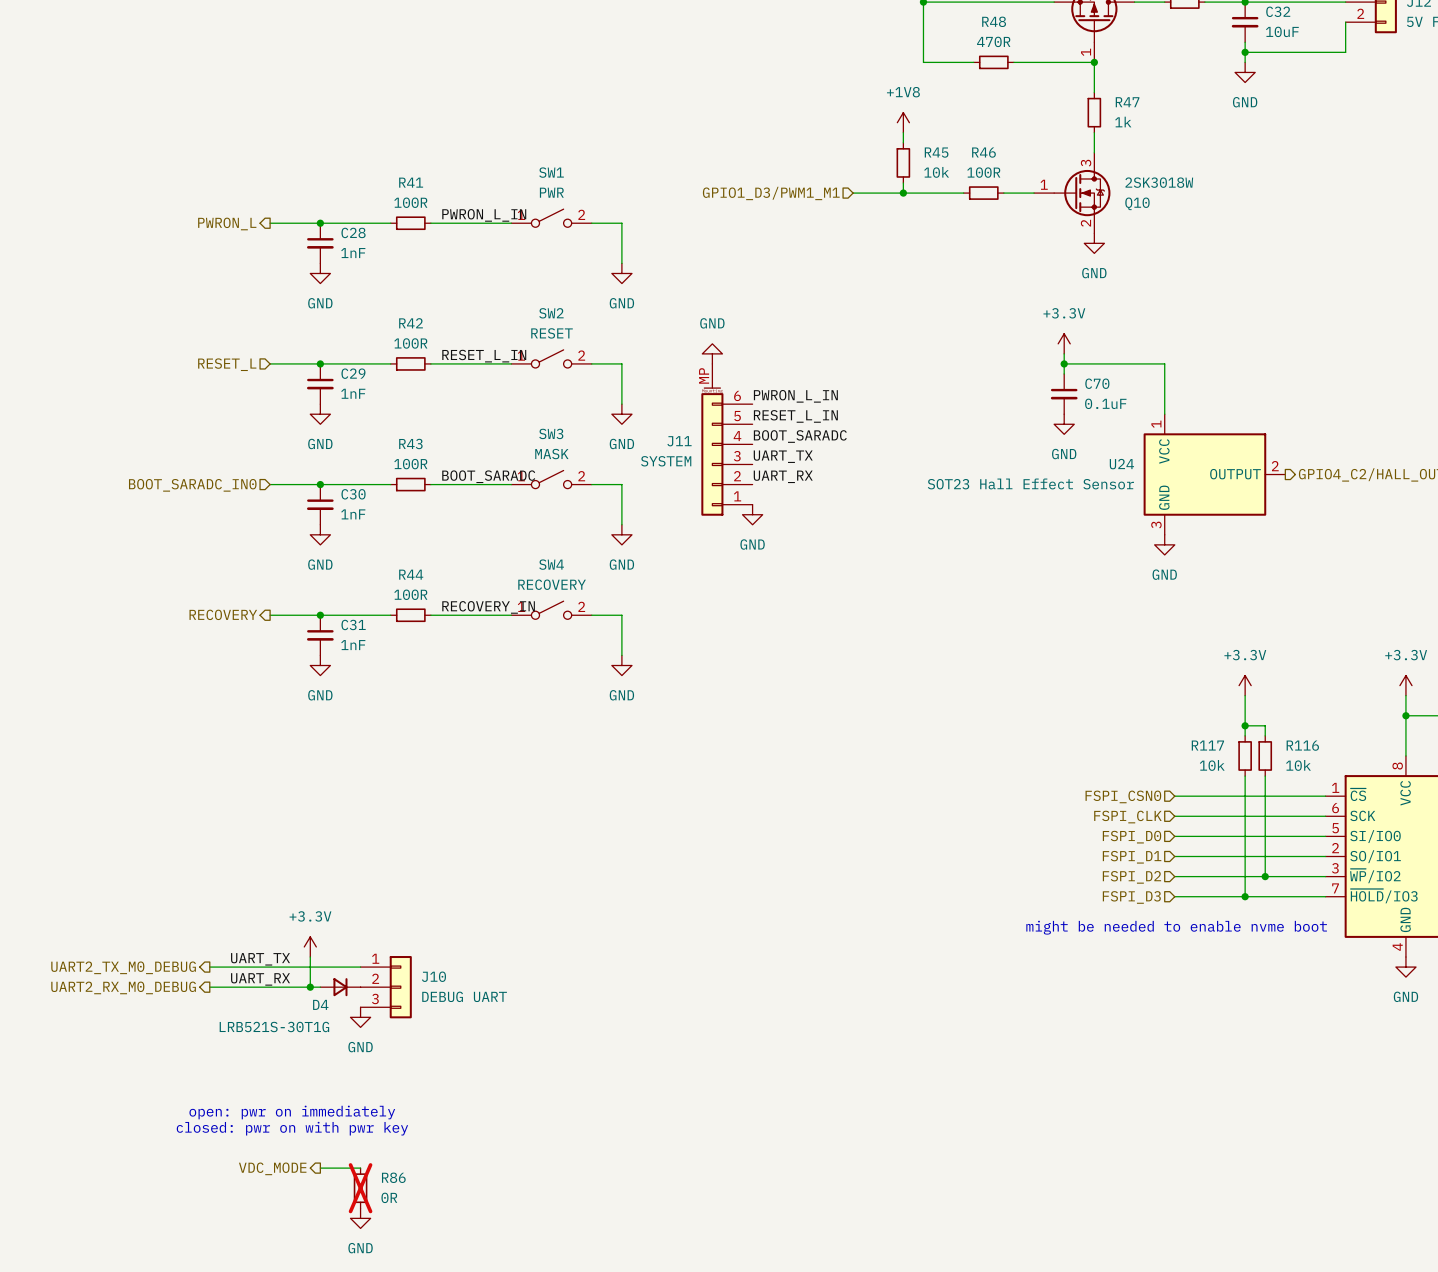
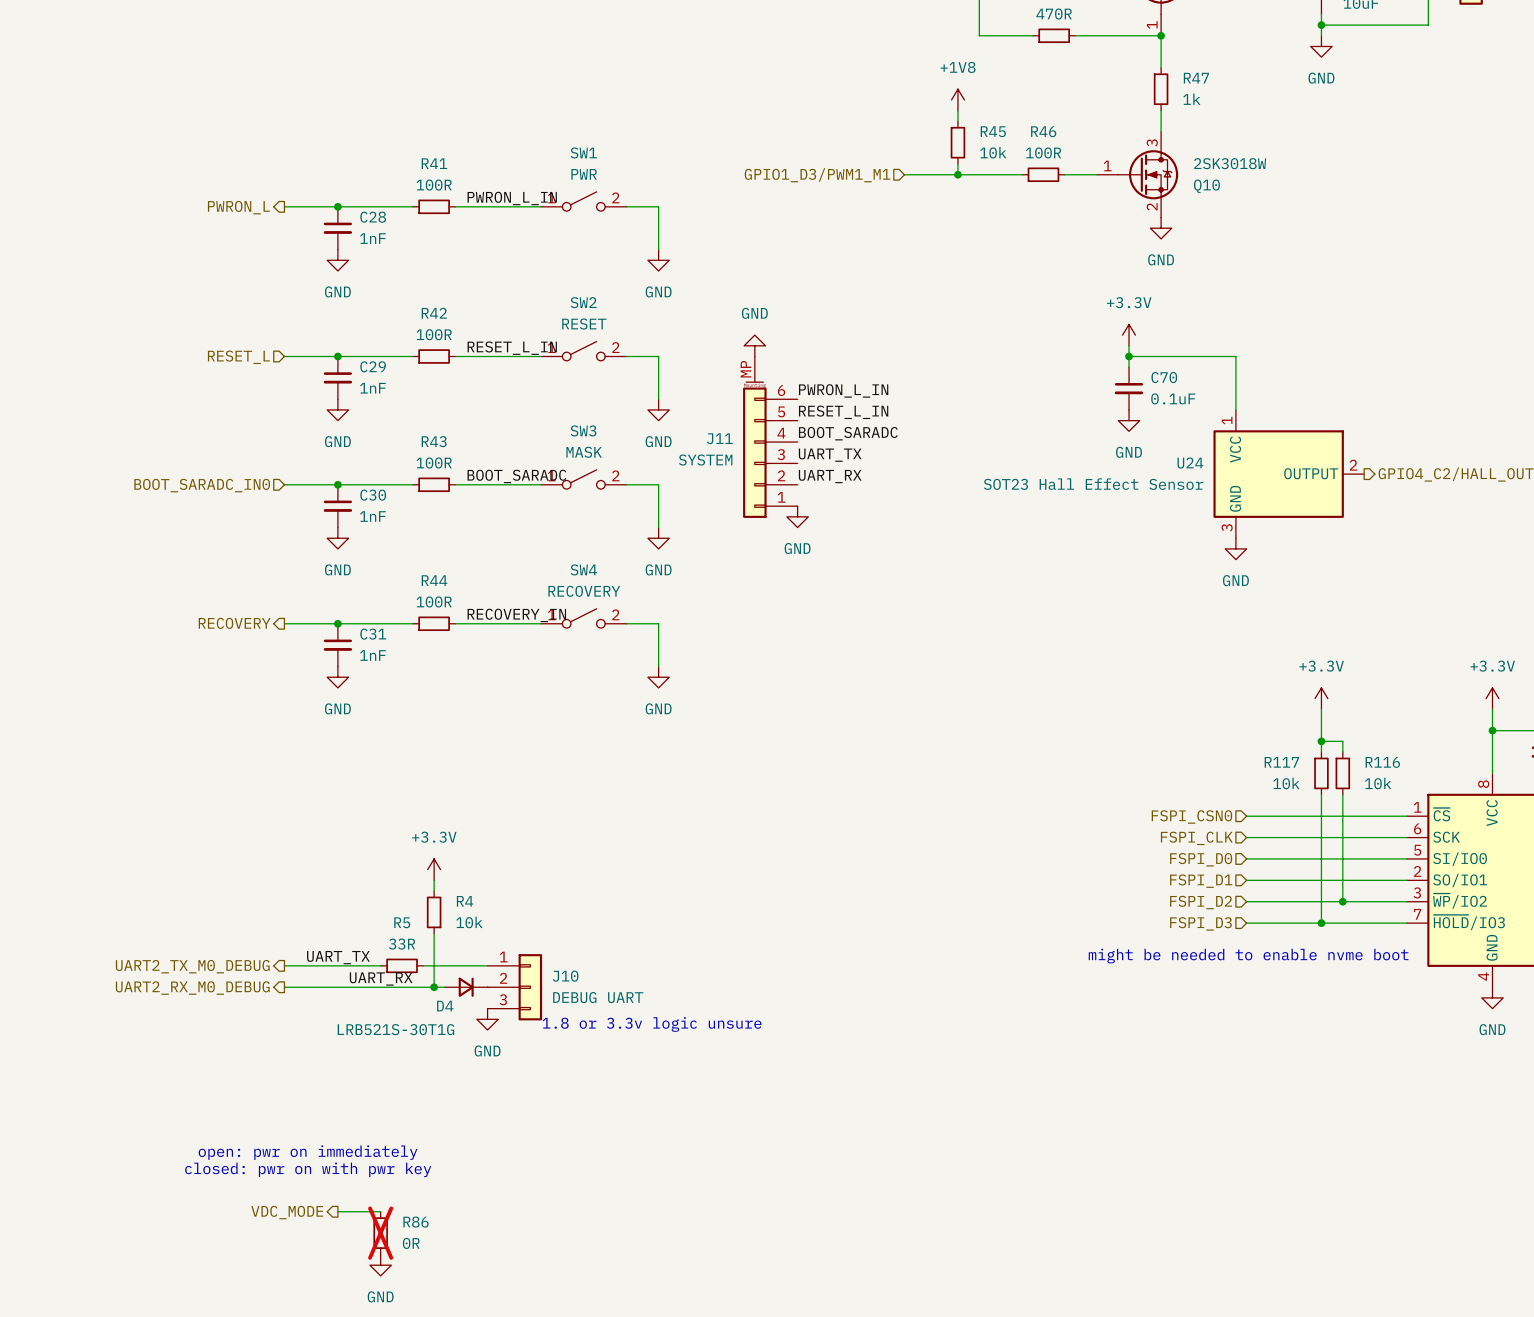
wire: none -> (434, 880) (434, 891)
R4: none -> 10k (434, 912)
wire: none -> (434, 933) (434, 987)
wire: none -> (284, 965) (380, 965)
R5: none -> 33R (402, 965)
wire: none -> (423, 965) (487, 965)
power symbol position: +3.3V (310, 946) -> +3.3V (434, 869)
wire: (310, 957) (310, 987) -> none
junction: none -> (434, 987)
label position: UART_TX (260, 959) -> UART_TX (338, 957)
hierarchical label position: UART2_TX_M0_DEBUG (123, 967) -> UART2_TX_M0_DEBUG (192, 966)
wire: (209, 967) (360, 967) -> (284, 987) (444, 987)
label position: UART_RX (260, 979) -> UART_RX (381, 979)
hierarchical label position: UART2_RX_M0_DEBUG (123, 987) -> UART2_RX_M0_DEBUG (192, 988)
wire: (209, 987) (320, 987) -> none
junction: (310, 987) -> none
D4 position: (340, 987) -> (466, 987)
J10 position: (386, 987) -> (514, 987)
text: none -> 1.8 or 3.3v logic unsure (652, 1024)
power symbol position: GND (360, 1017) -> GND (487, 1019)

